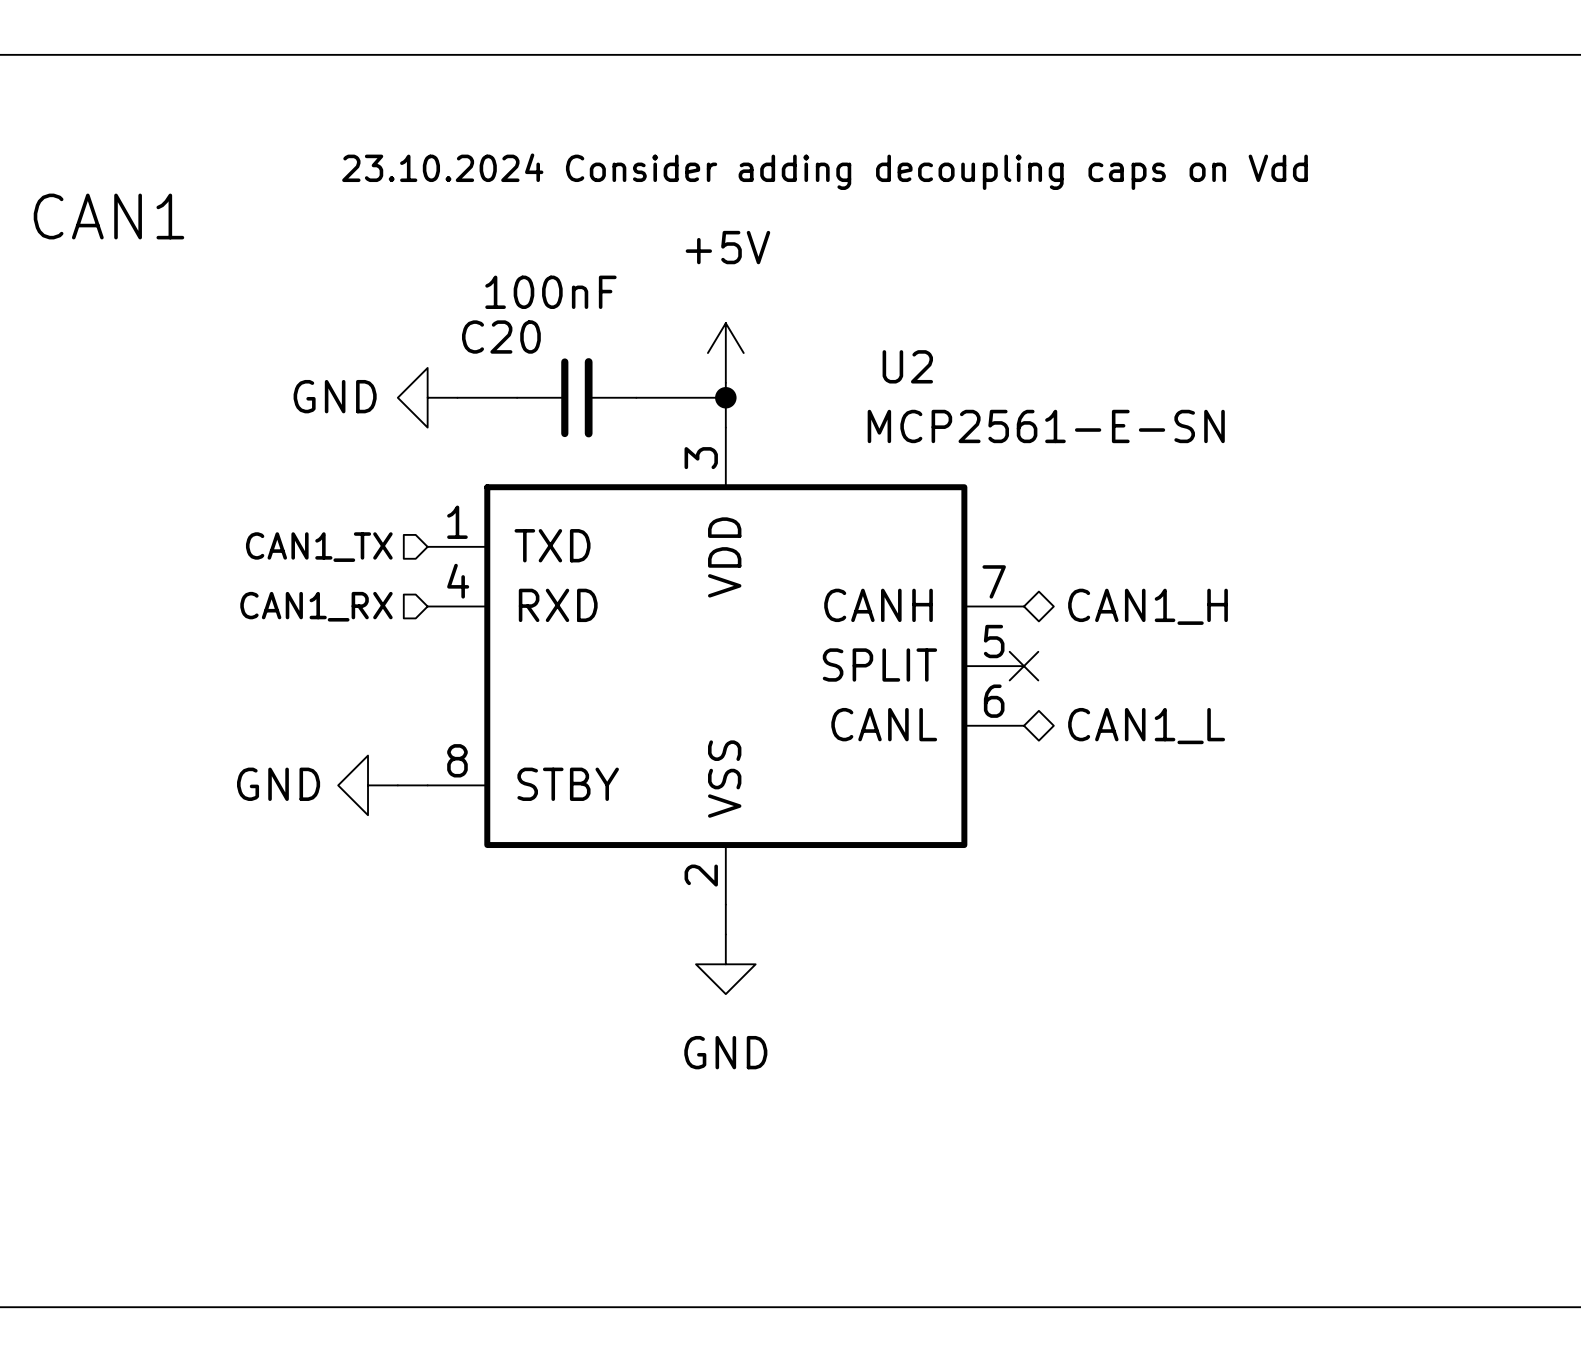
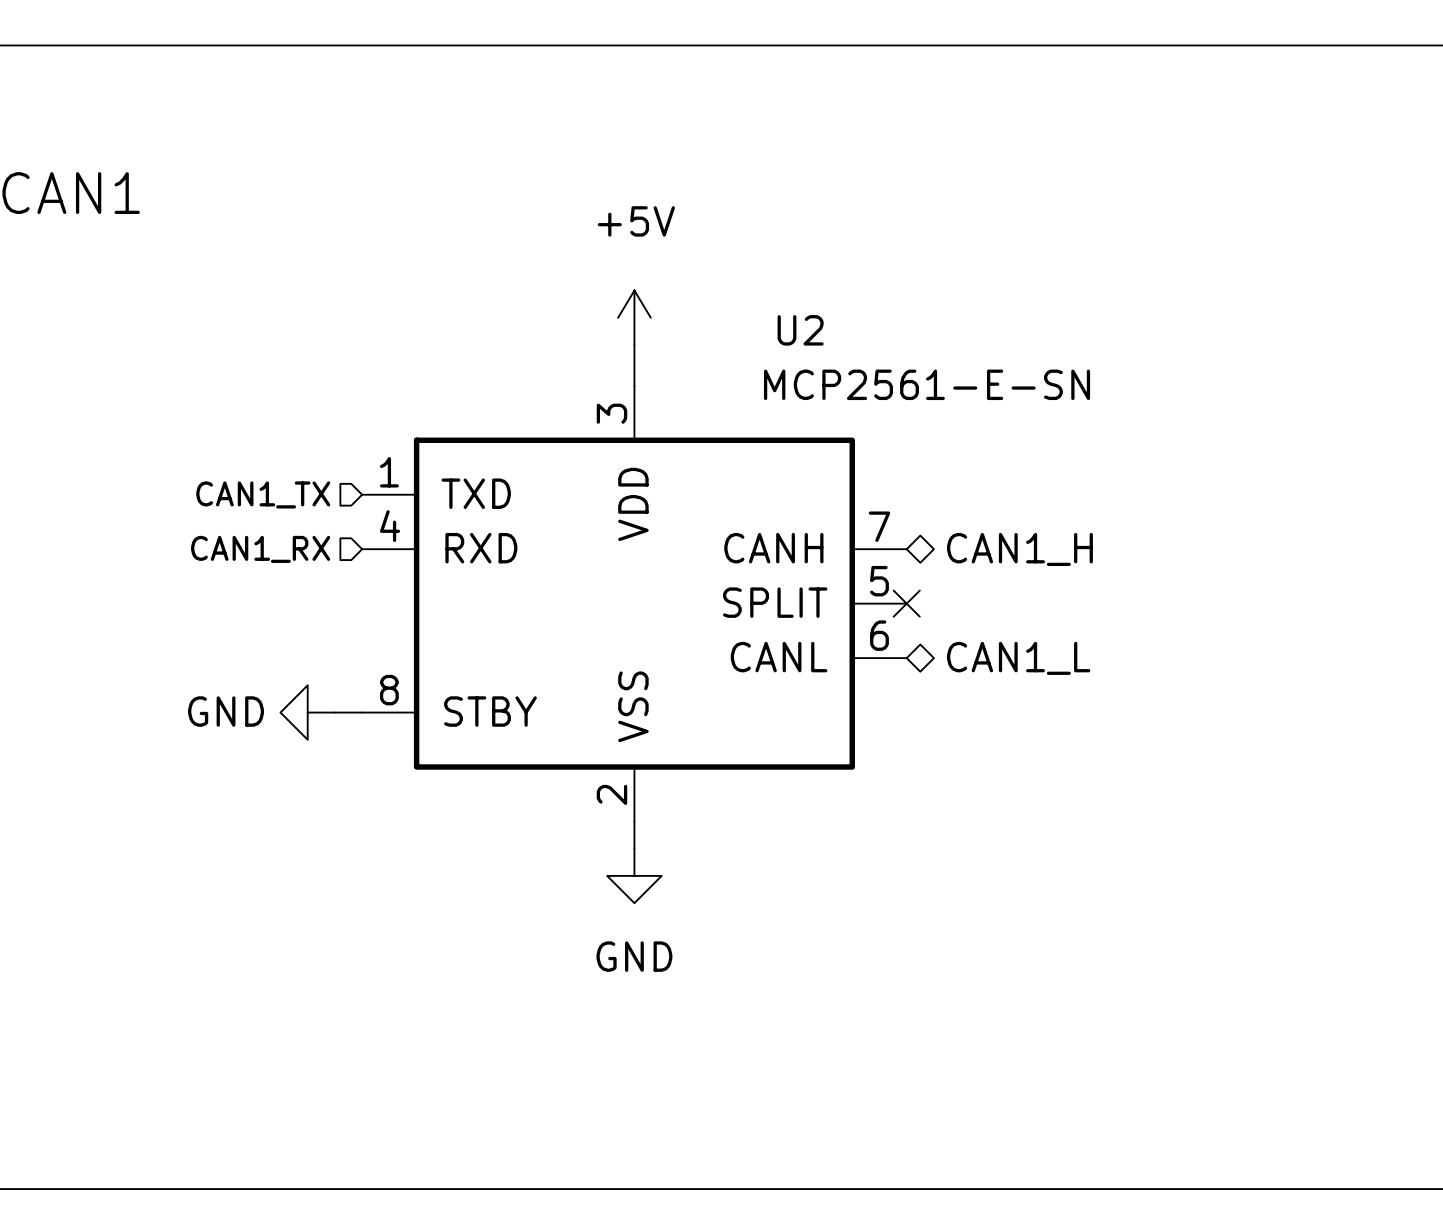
text: 23.10.2024 Consider adding decoupling caps on Vdd (825, 171) -> none
power symbol: GND (427, 397) -> none
wire: (457, 397) (517, 397) -> none
C20: 100nF (576, 397) -> none
wire: (636, 397) (725, 397) -> none
junction: (725, 397) -> none

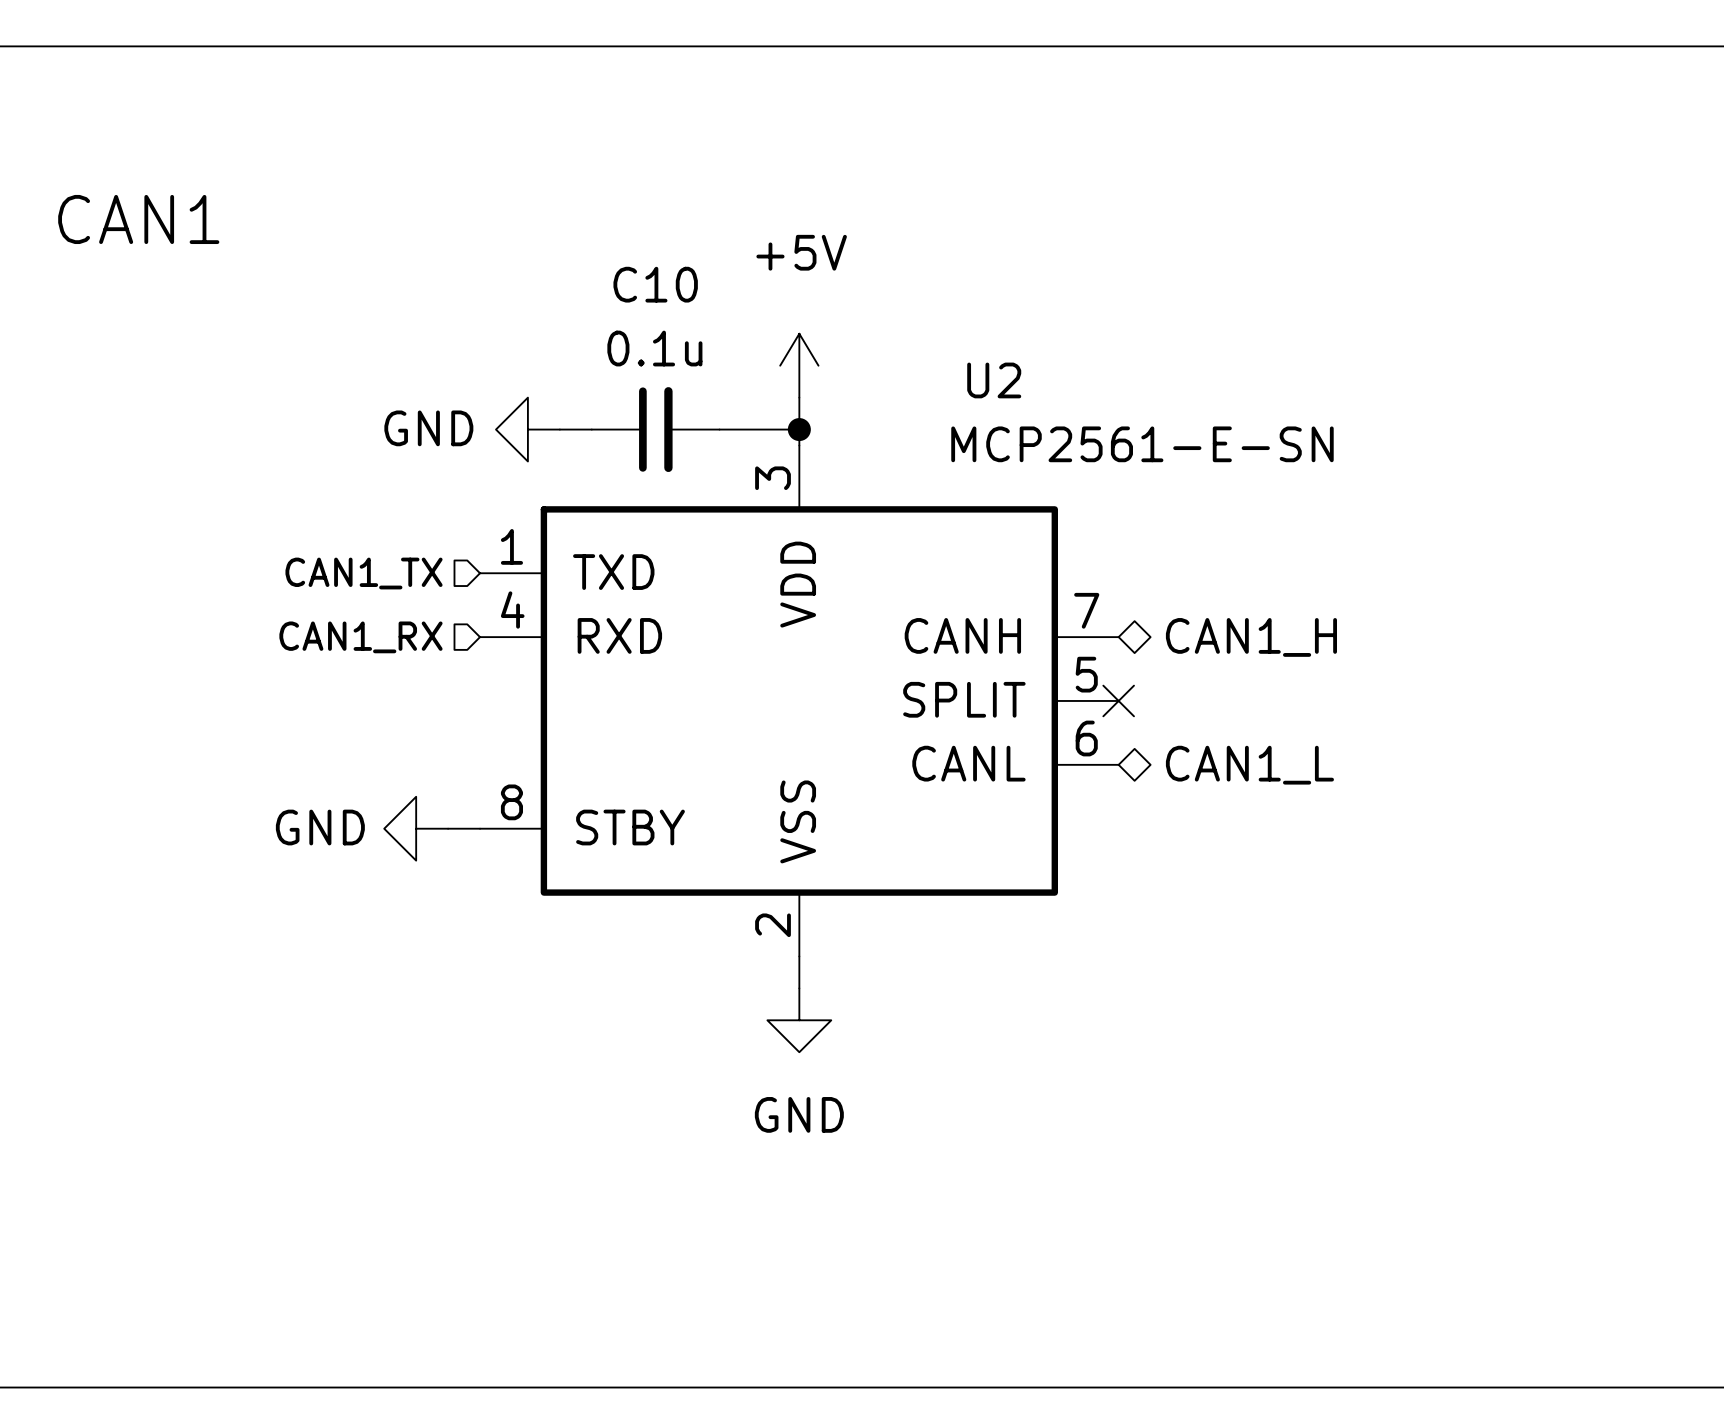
power symbol: none -> GND (527, 429)
wire: none -> (559, 429) (591, 429)
C10: none -> 0.1u (655, 429)
wire: none -> (719, 429) (799, 429)
junction: none -> (799, 429)

